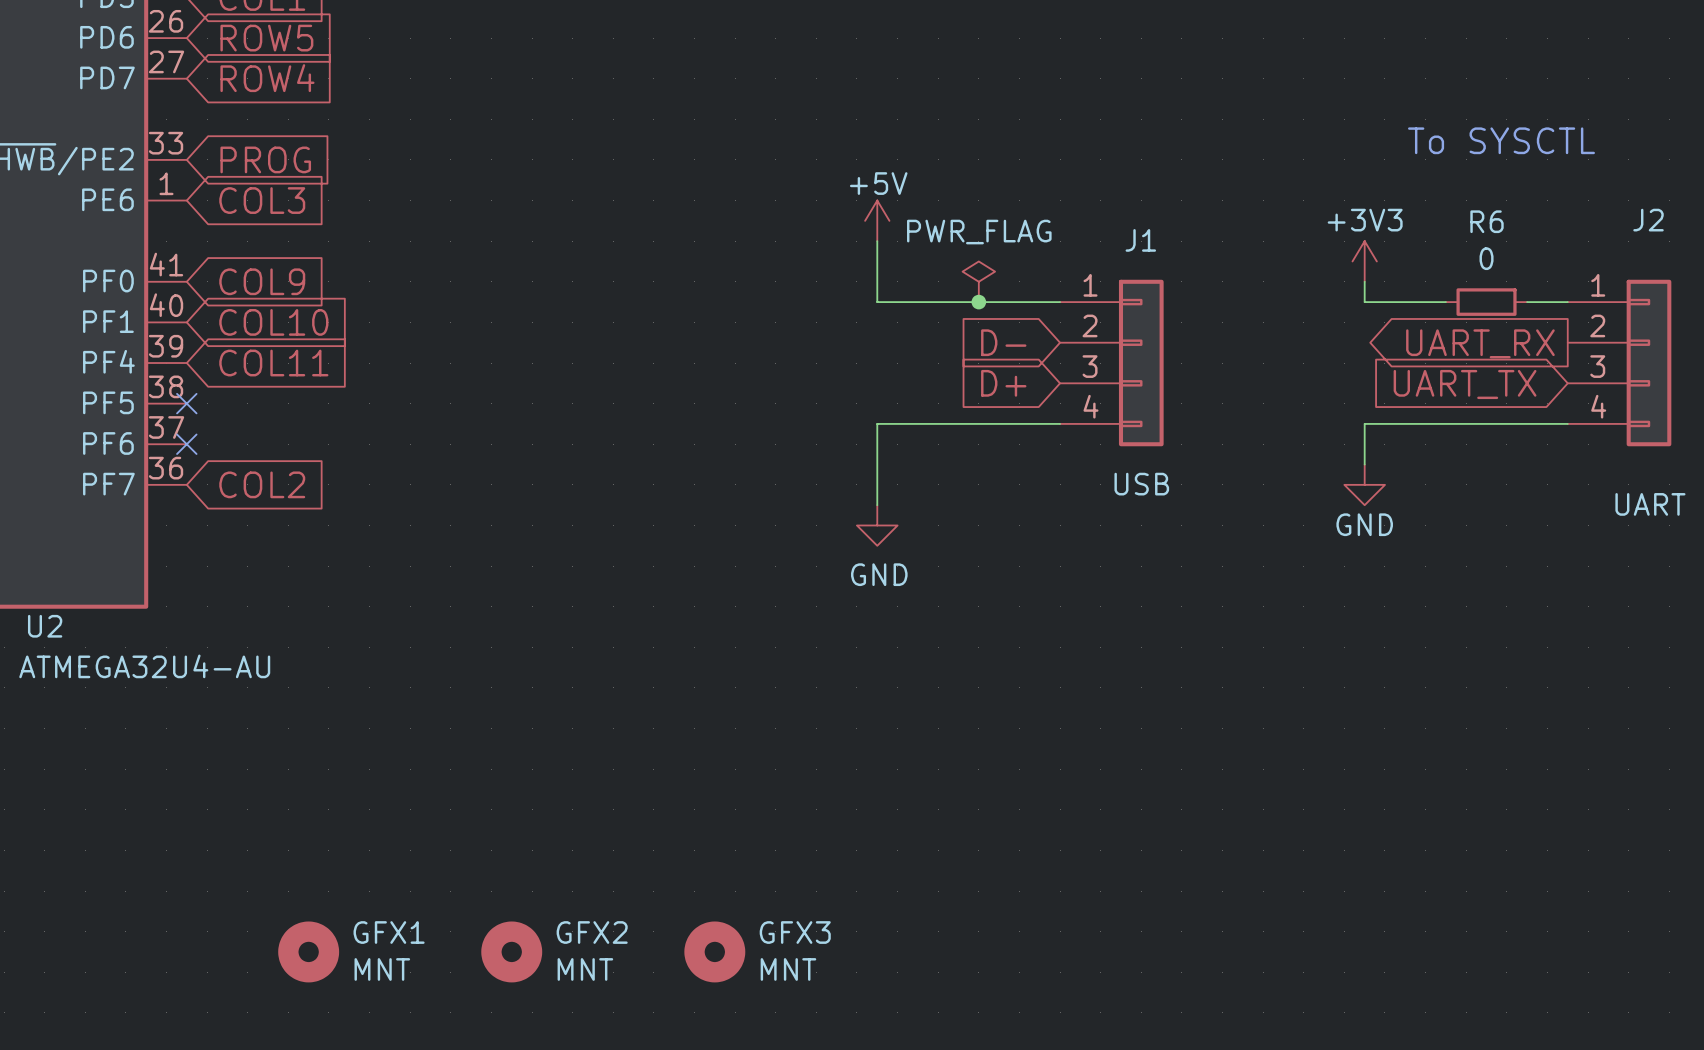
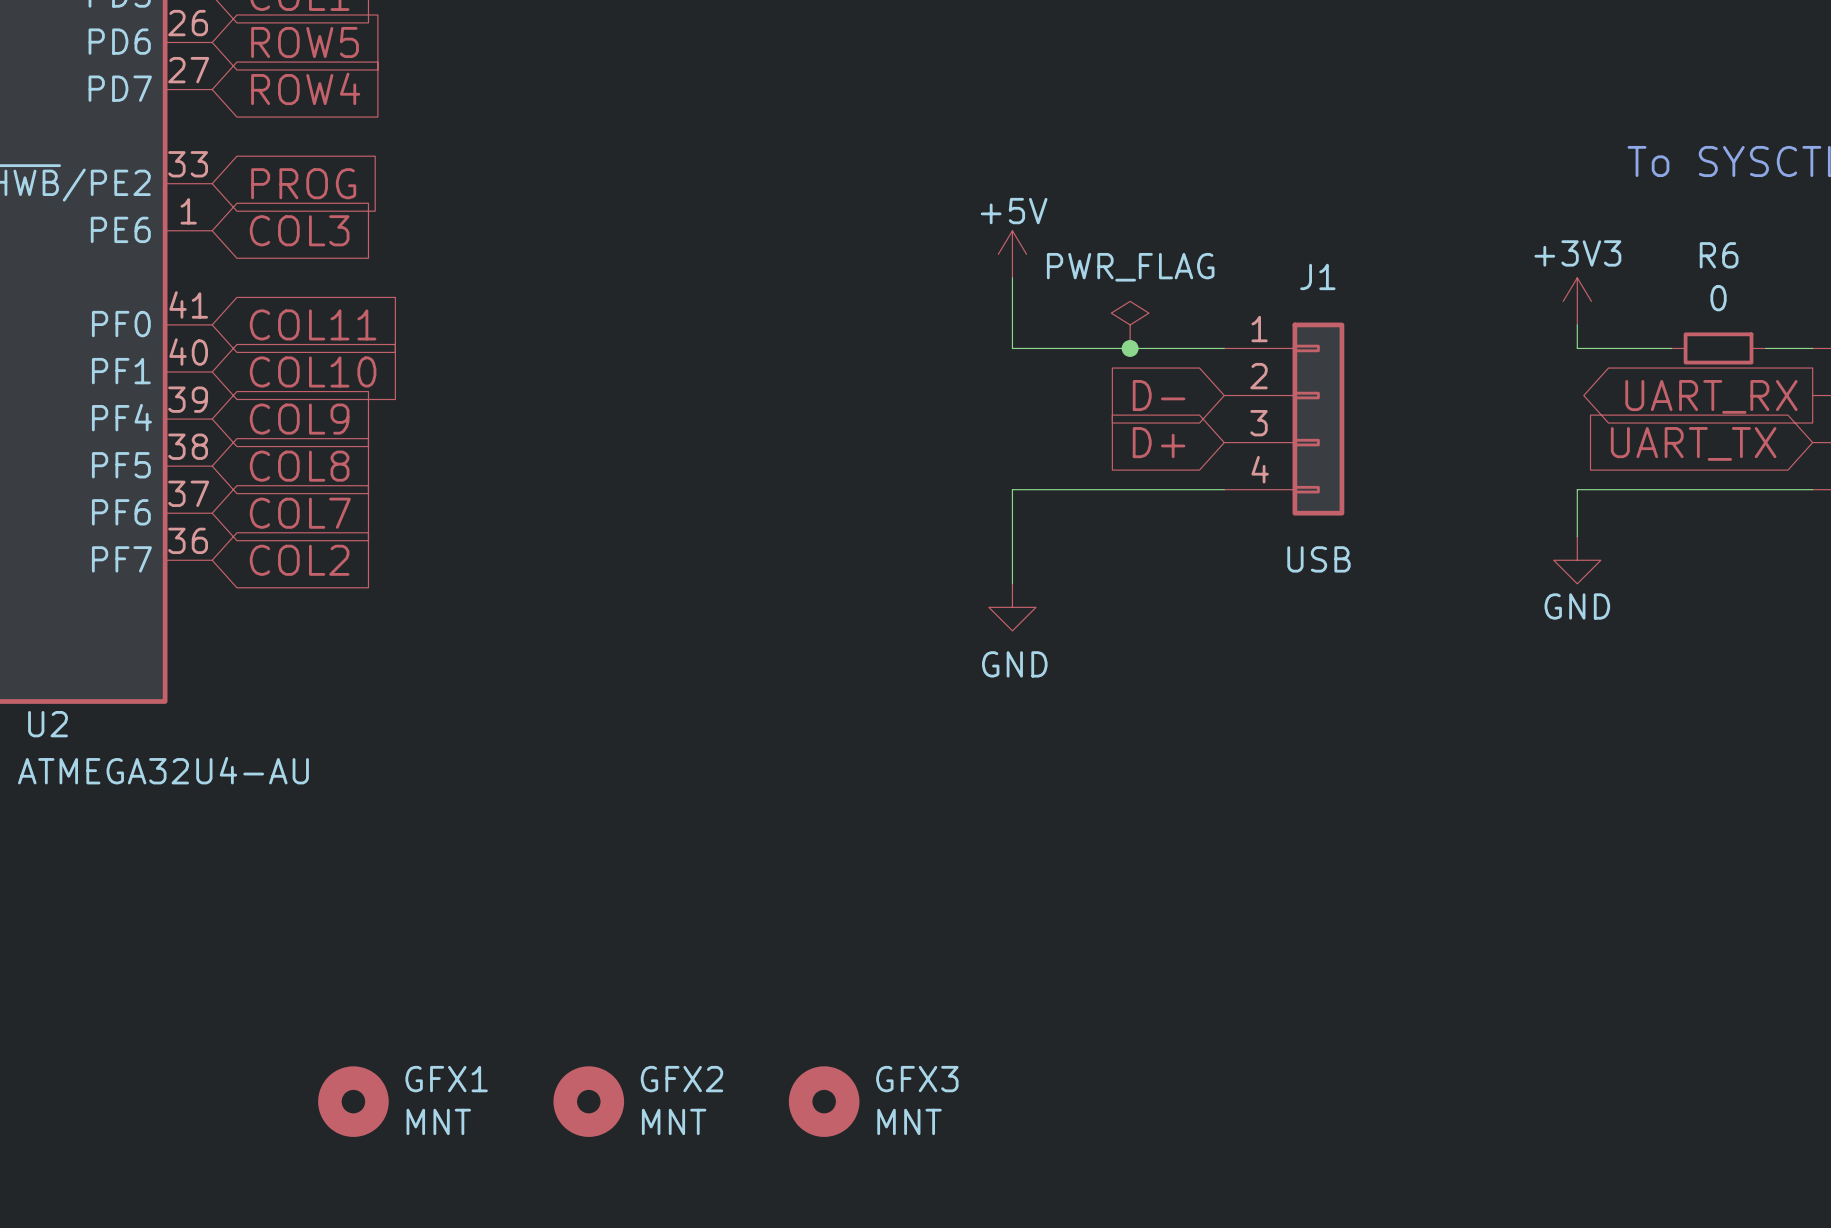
global label: COL9 (262, 281) -> COL11 (313, 324)
global label: COL11 (273, 363) -> COL9 (299, 419)
no-connect mark: (186, 403) -> none
global label: none -> COL8 (299, 466)
no-connect mark: (186, 444) -> none
global label: none -> COL7 (300, 513)

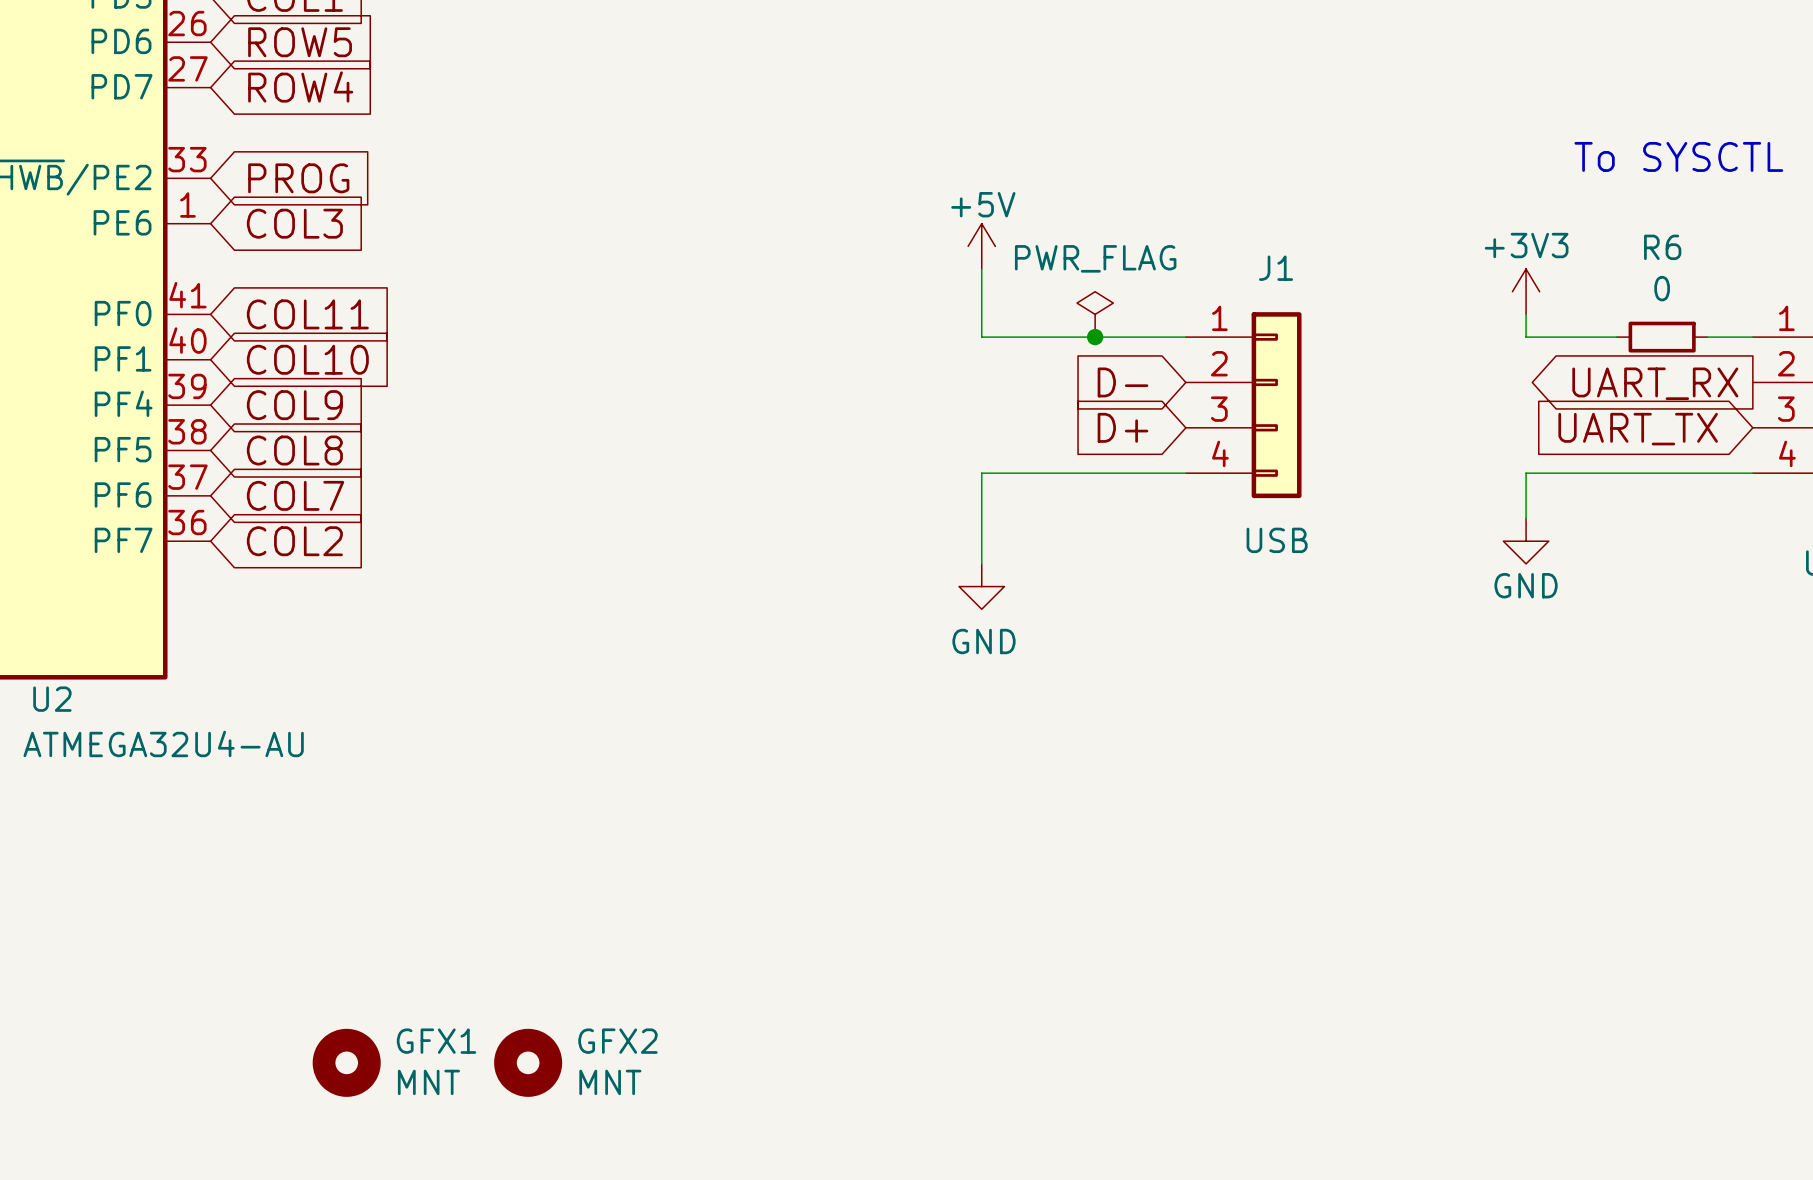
GFX2 position: (588, 1101) -> (528, 1062)
GFX3: MNT (824, 1101) -> none

